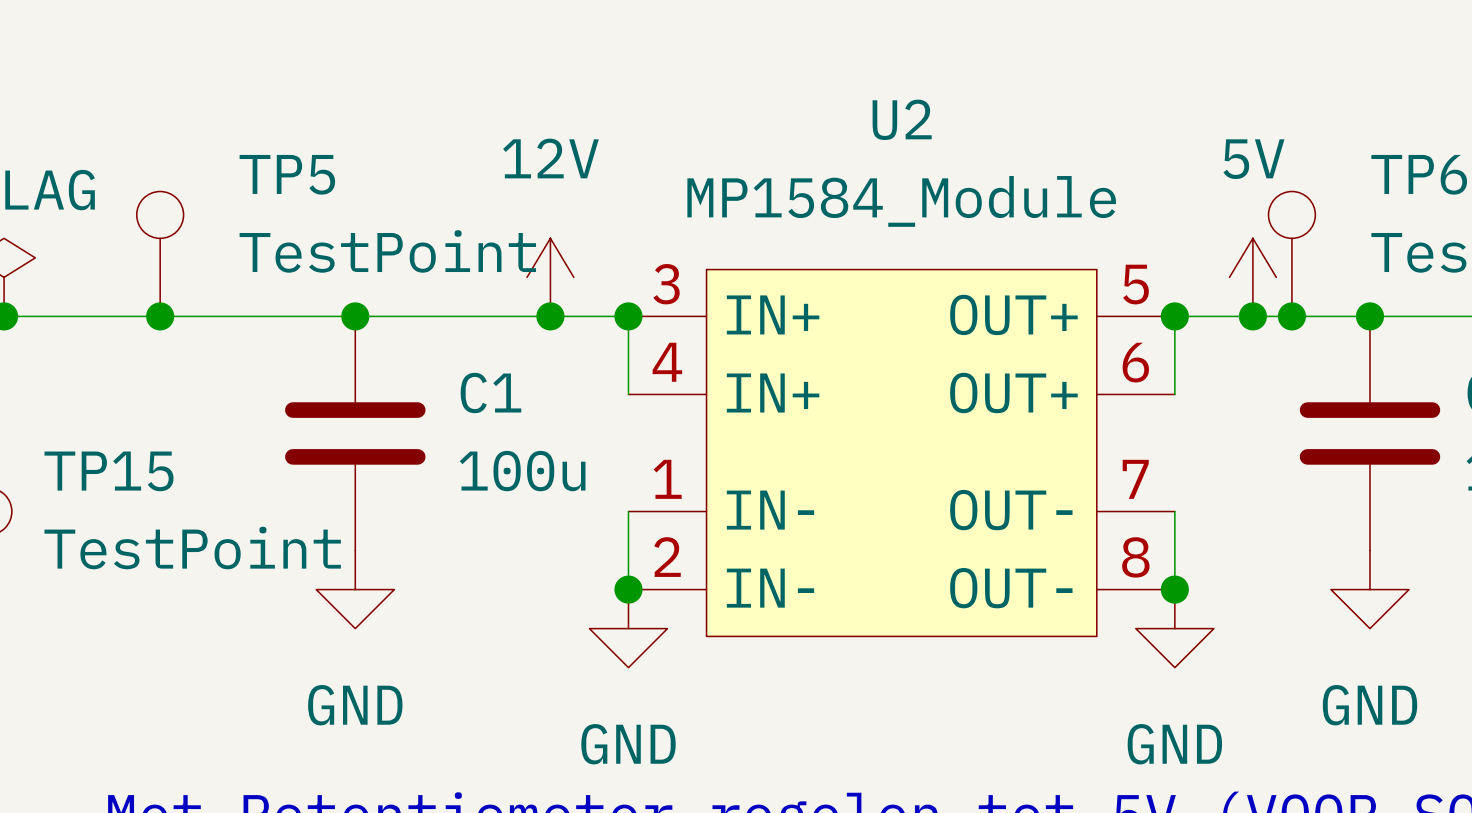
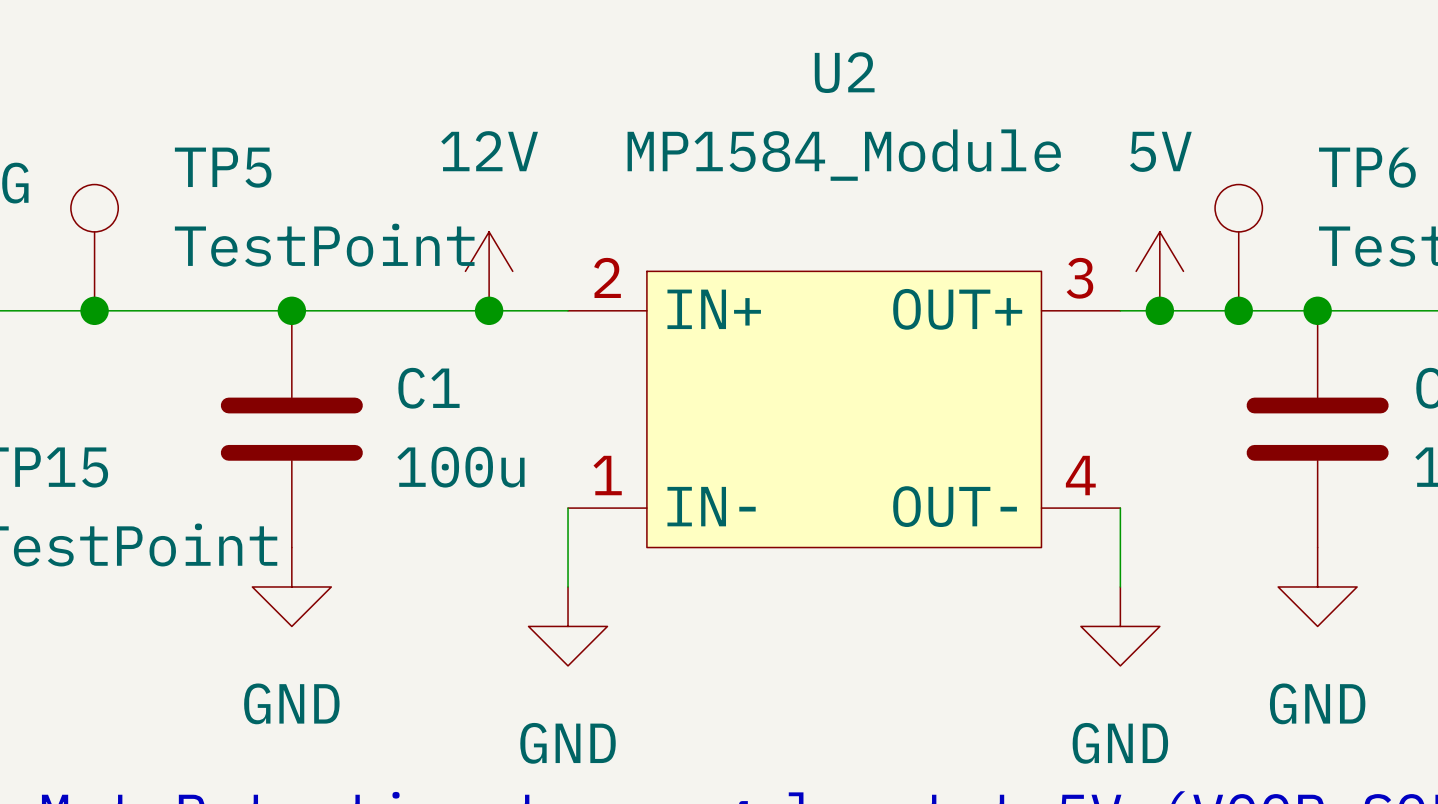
U2 symbol: [628, 269, 1175, 637] -> [568, 271, 1121, 548]
power symbol position: 5V (1252, 277) -> 5V (1159, 271)
wire: (628, 316) (628, 394) -> none
junction: (628, 316) -> none
wire: (1174, 316) (1174, 394) -> none
junction: (1174, 316) -> none
junction: none -> (1159, 310)
junction: (1252, 316) -> none
junction: (628, 589) -> none
junction: (1174, 589) -> none

